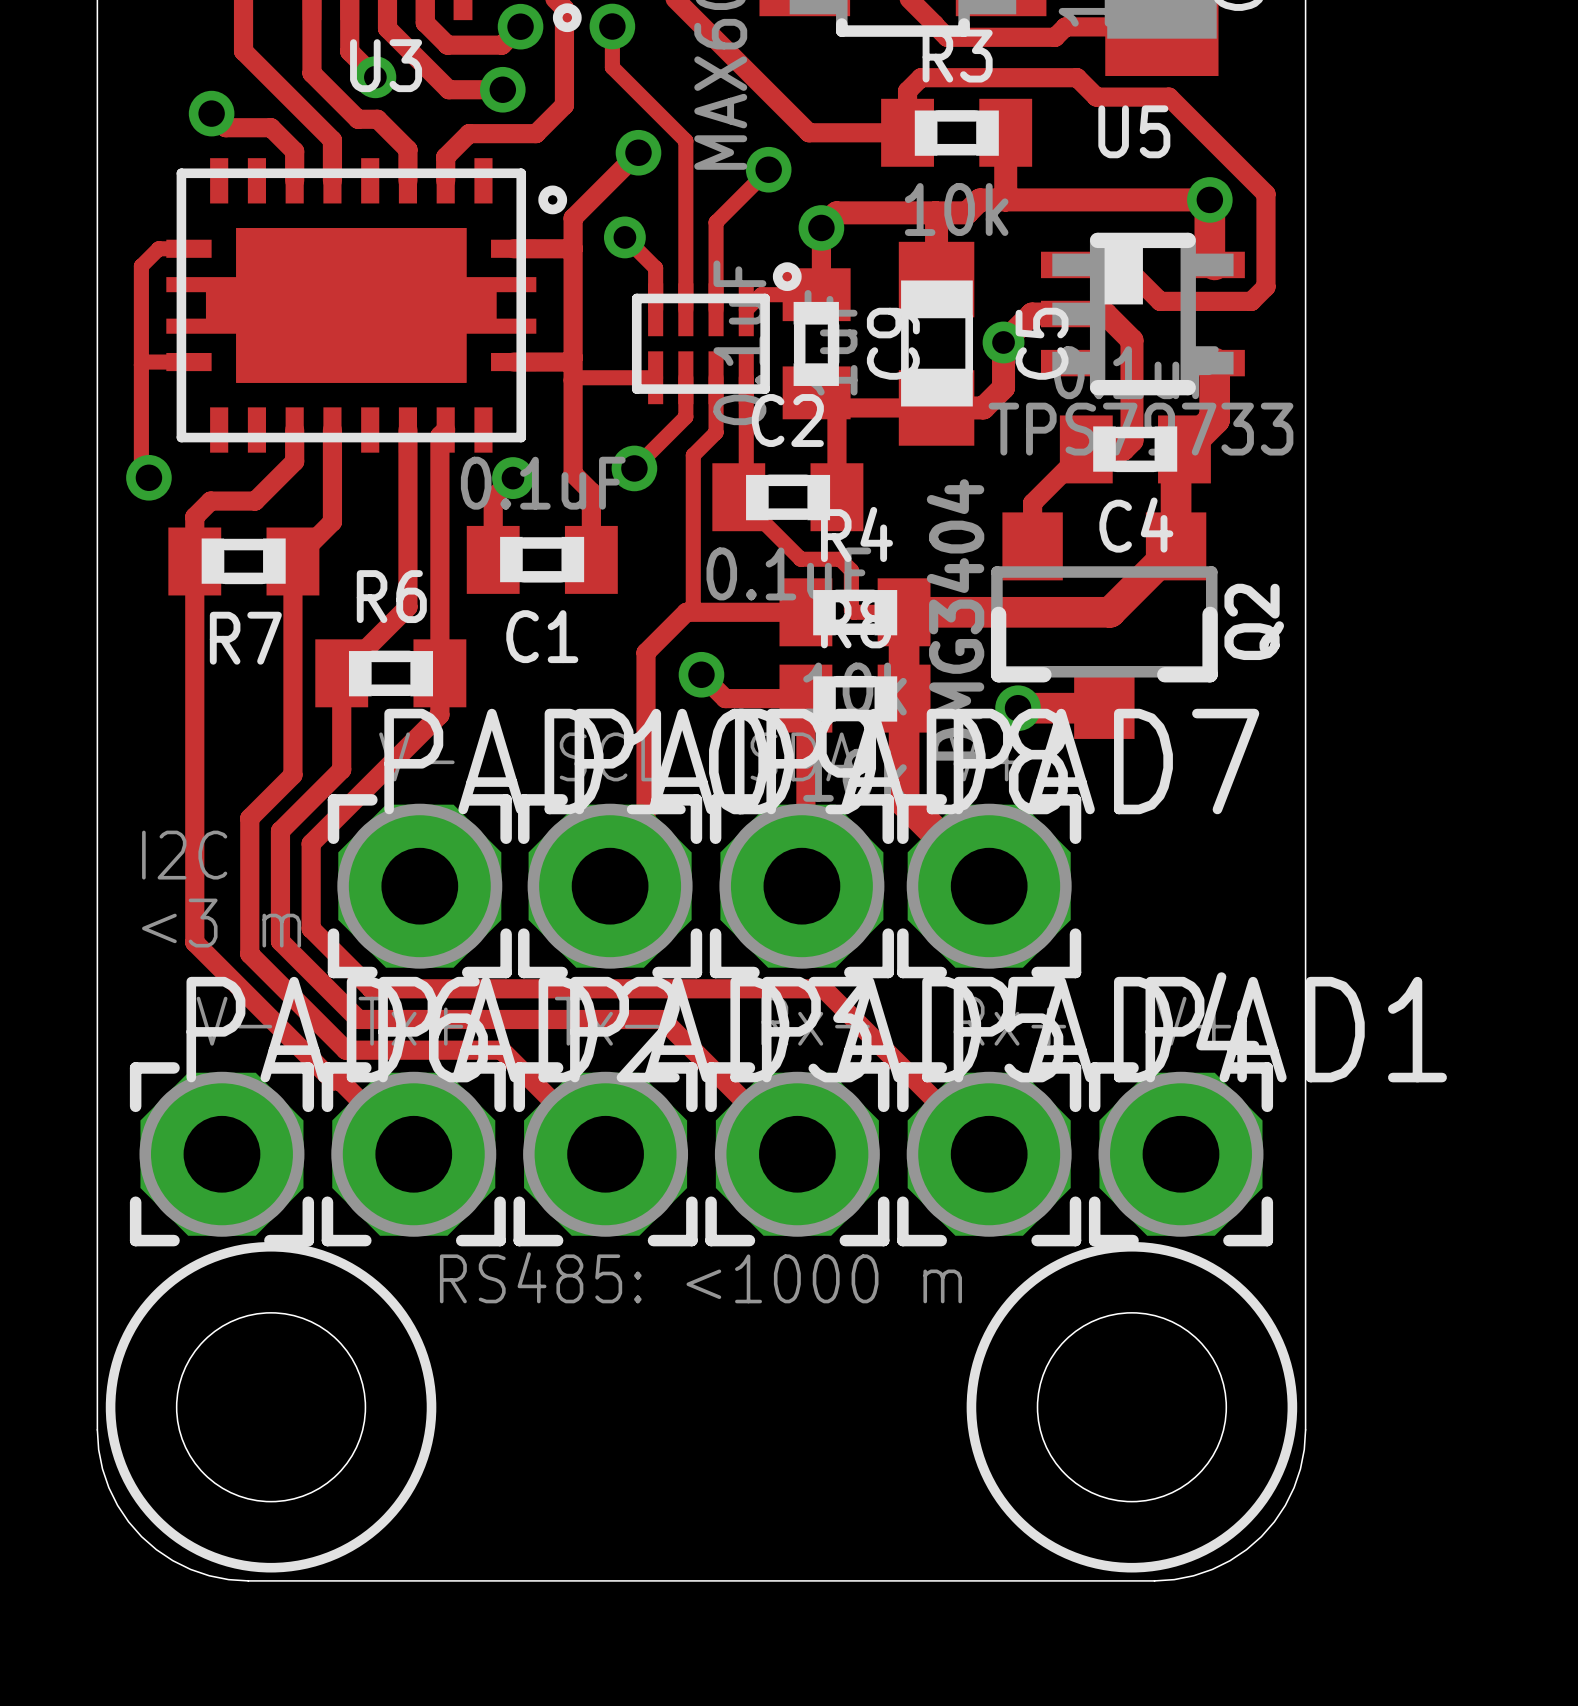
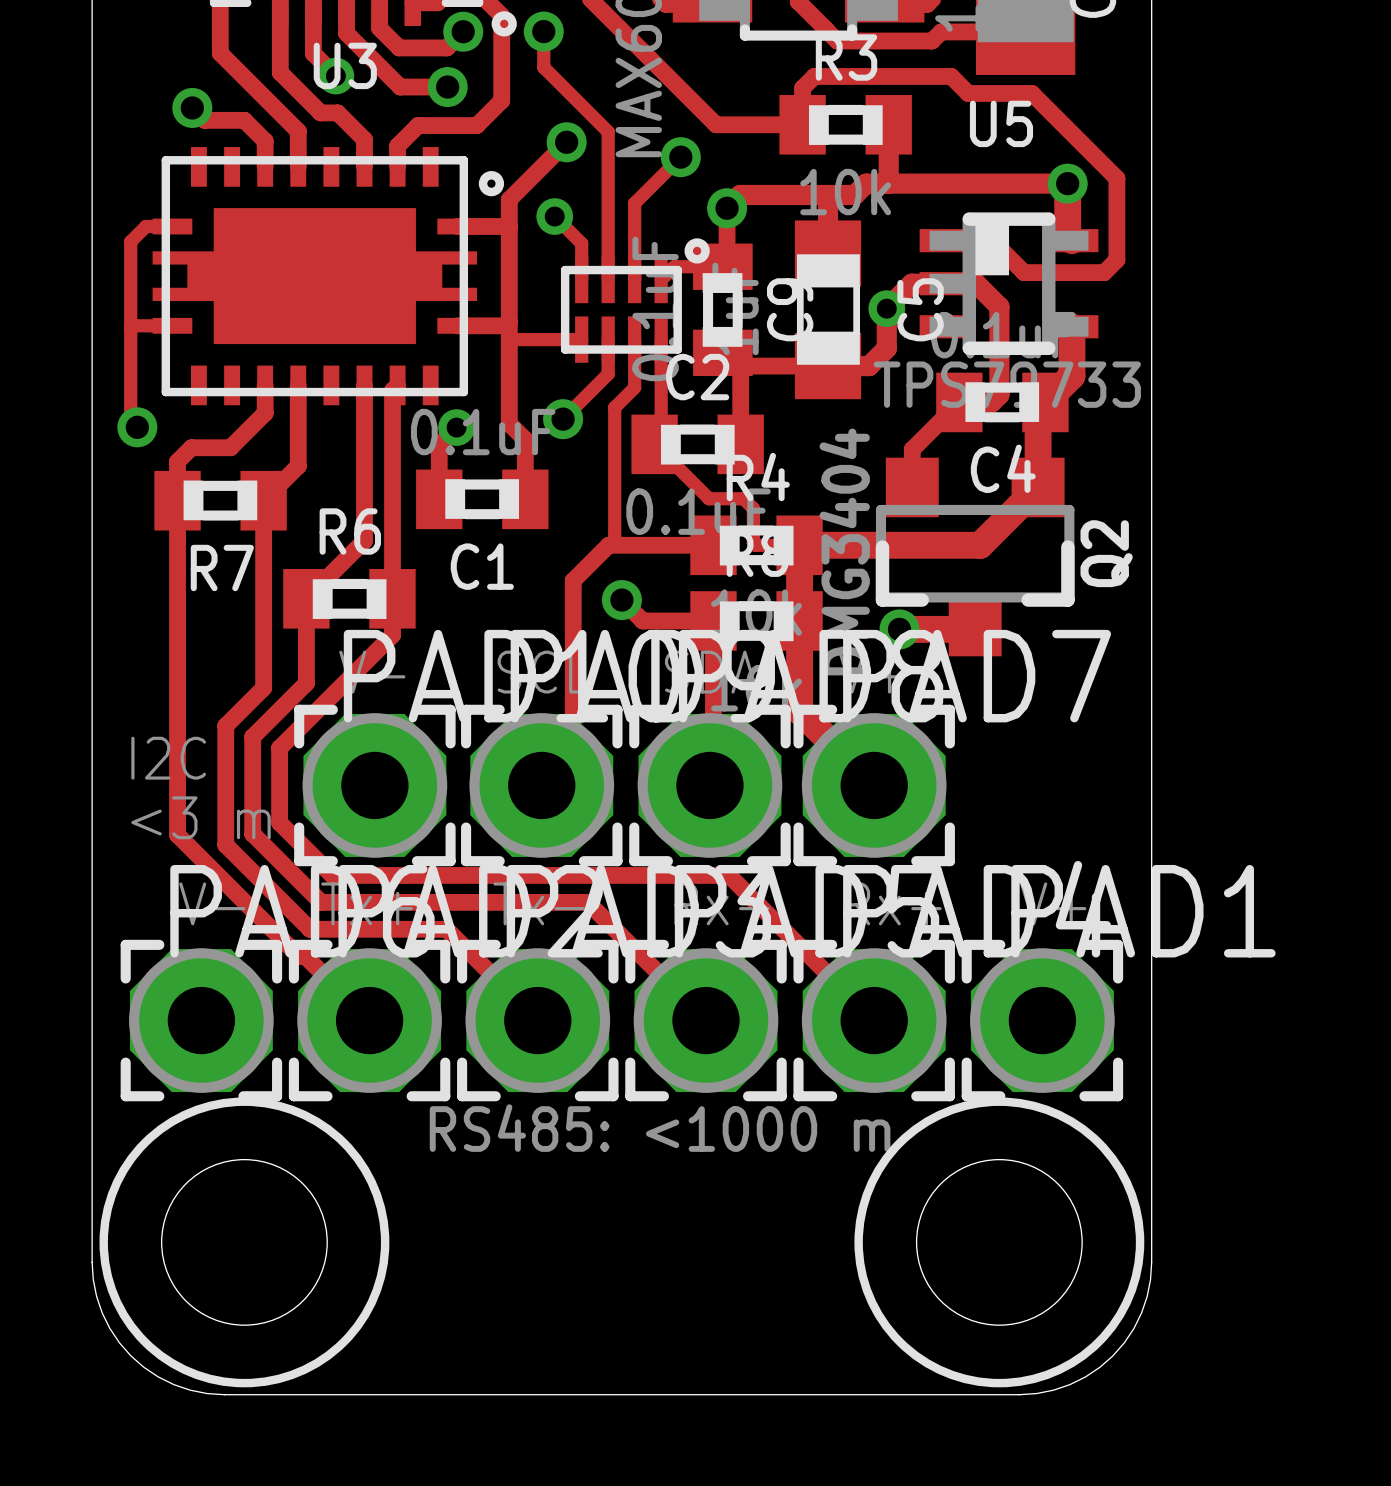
text position: RS485: <1000 m (700, 1277) -> RS485: <1000 m (660, 1128)

